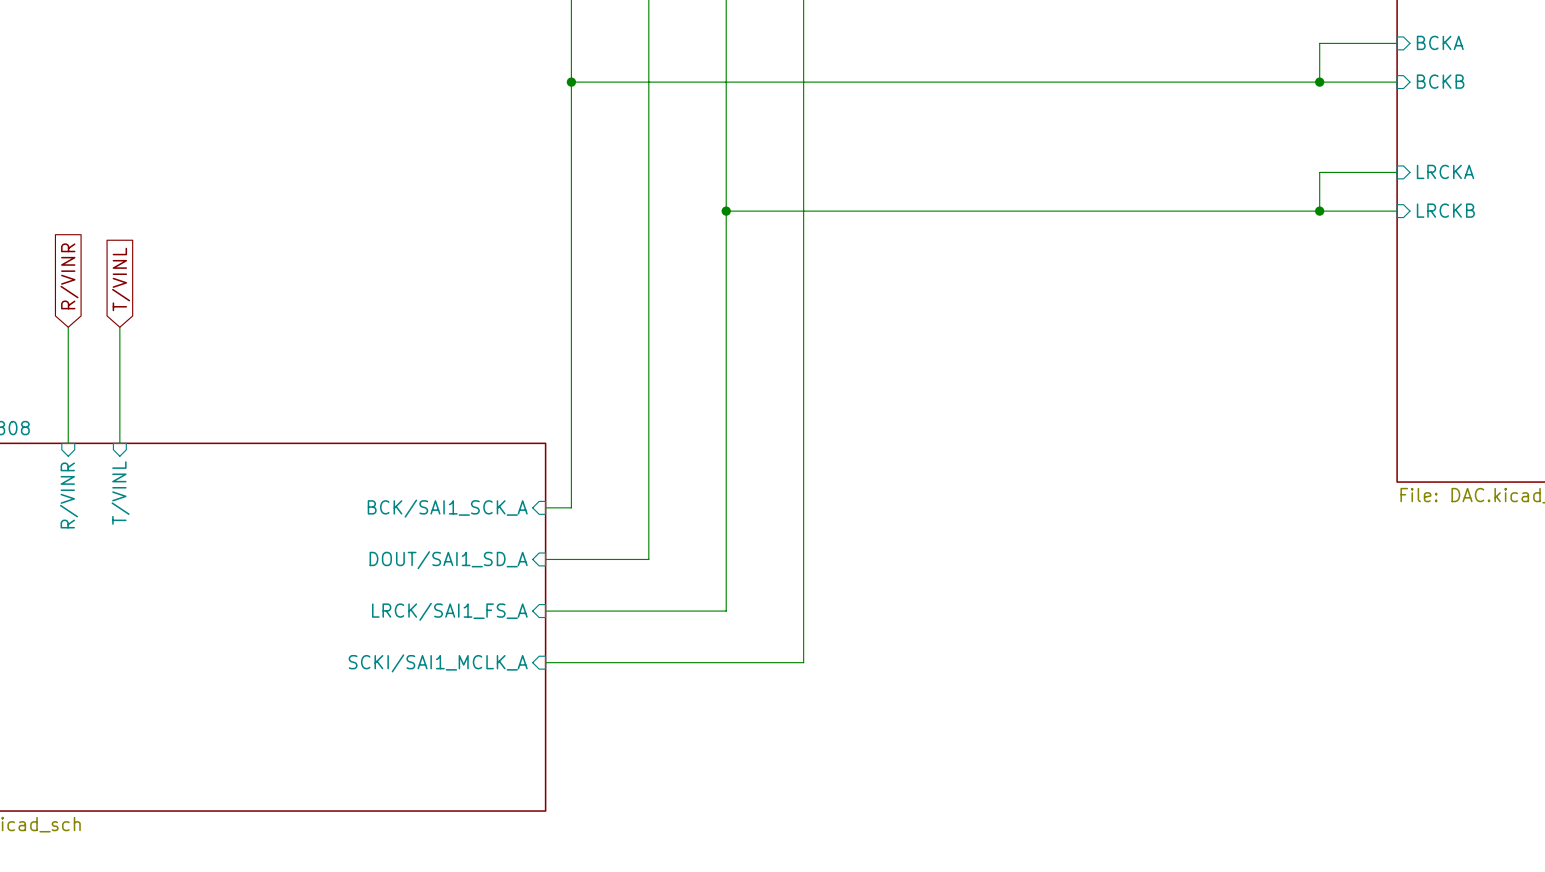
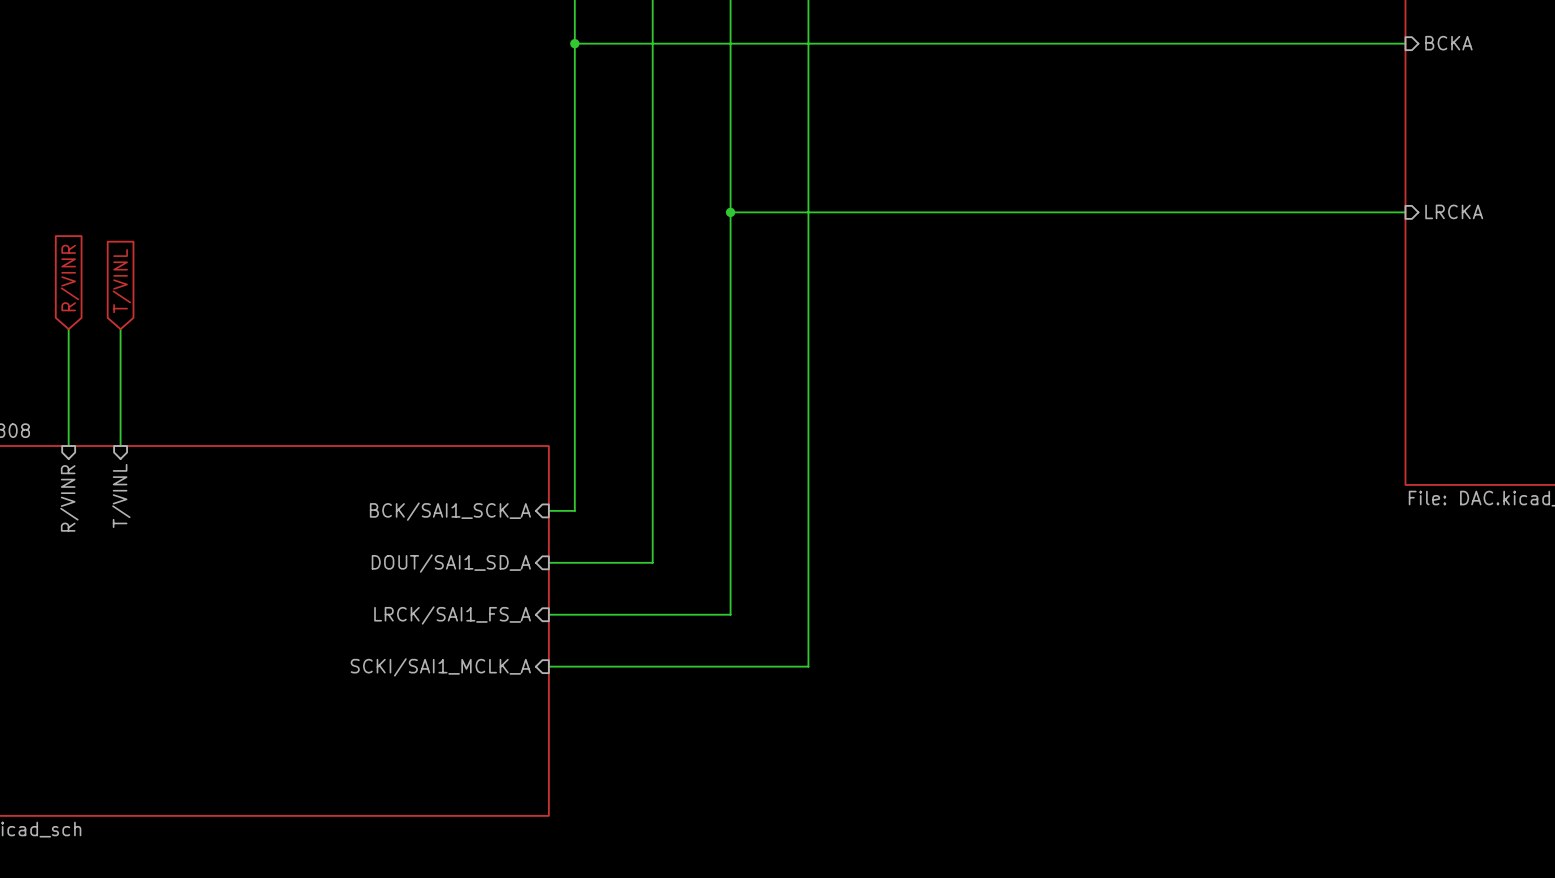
wire: (1319, 43) (1319, 82) -> (1327, 43) (574, 43)
sheet pin: BCKB (1440, 81) -> none
wire: (571, 82) (1397, 82) -> none
junction position: (571, 82) -> (574, 43)
junction: (1319, 82) -> none
sheet pin: LRCKA (1445, 171) -> none
wire: (1397, 172) (1319, 172) (1319, 211) -> none
sheet pin: LRCKB (1445, 210) -> LRCKA (1454, 211)
junction: (1319, 211) -> none

